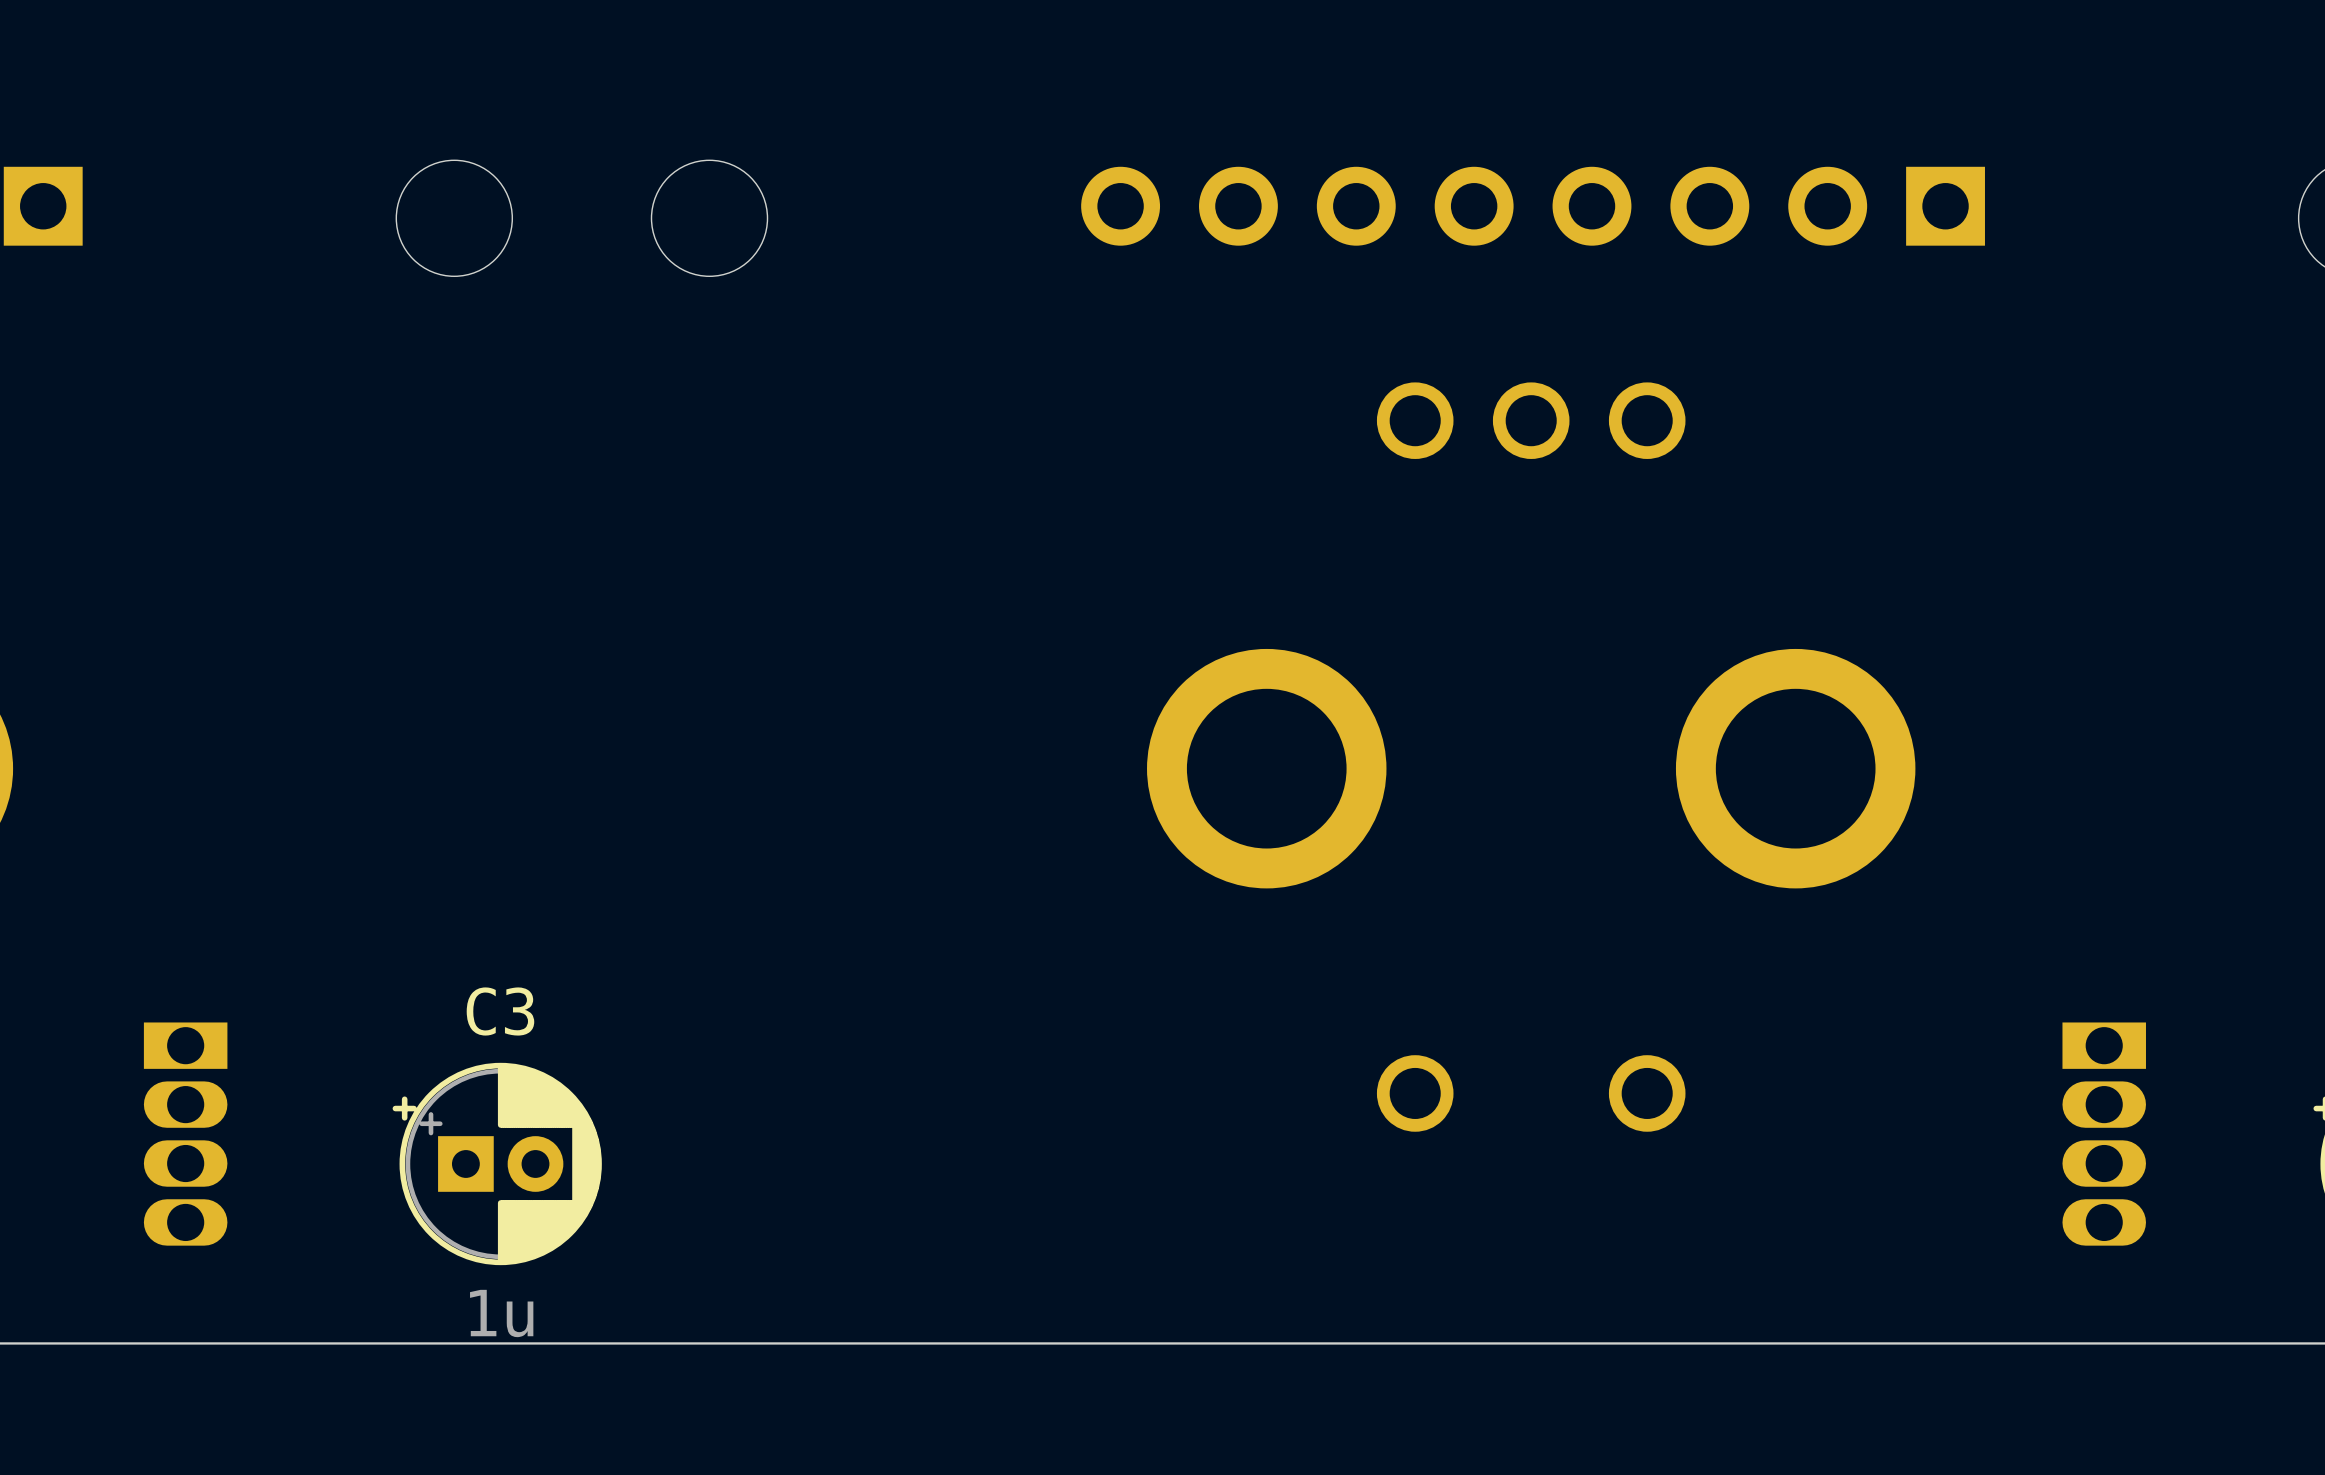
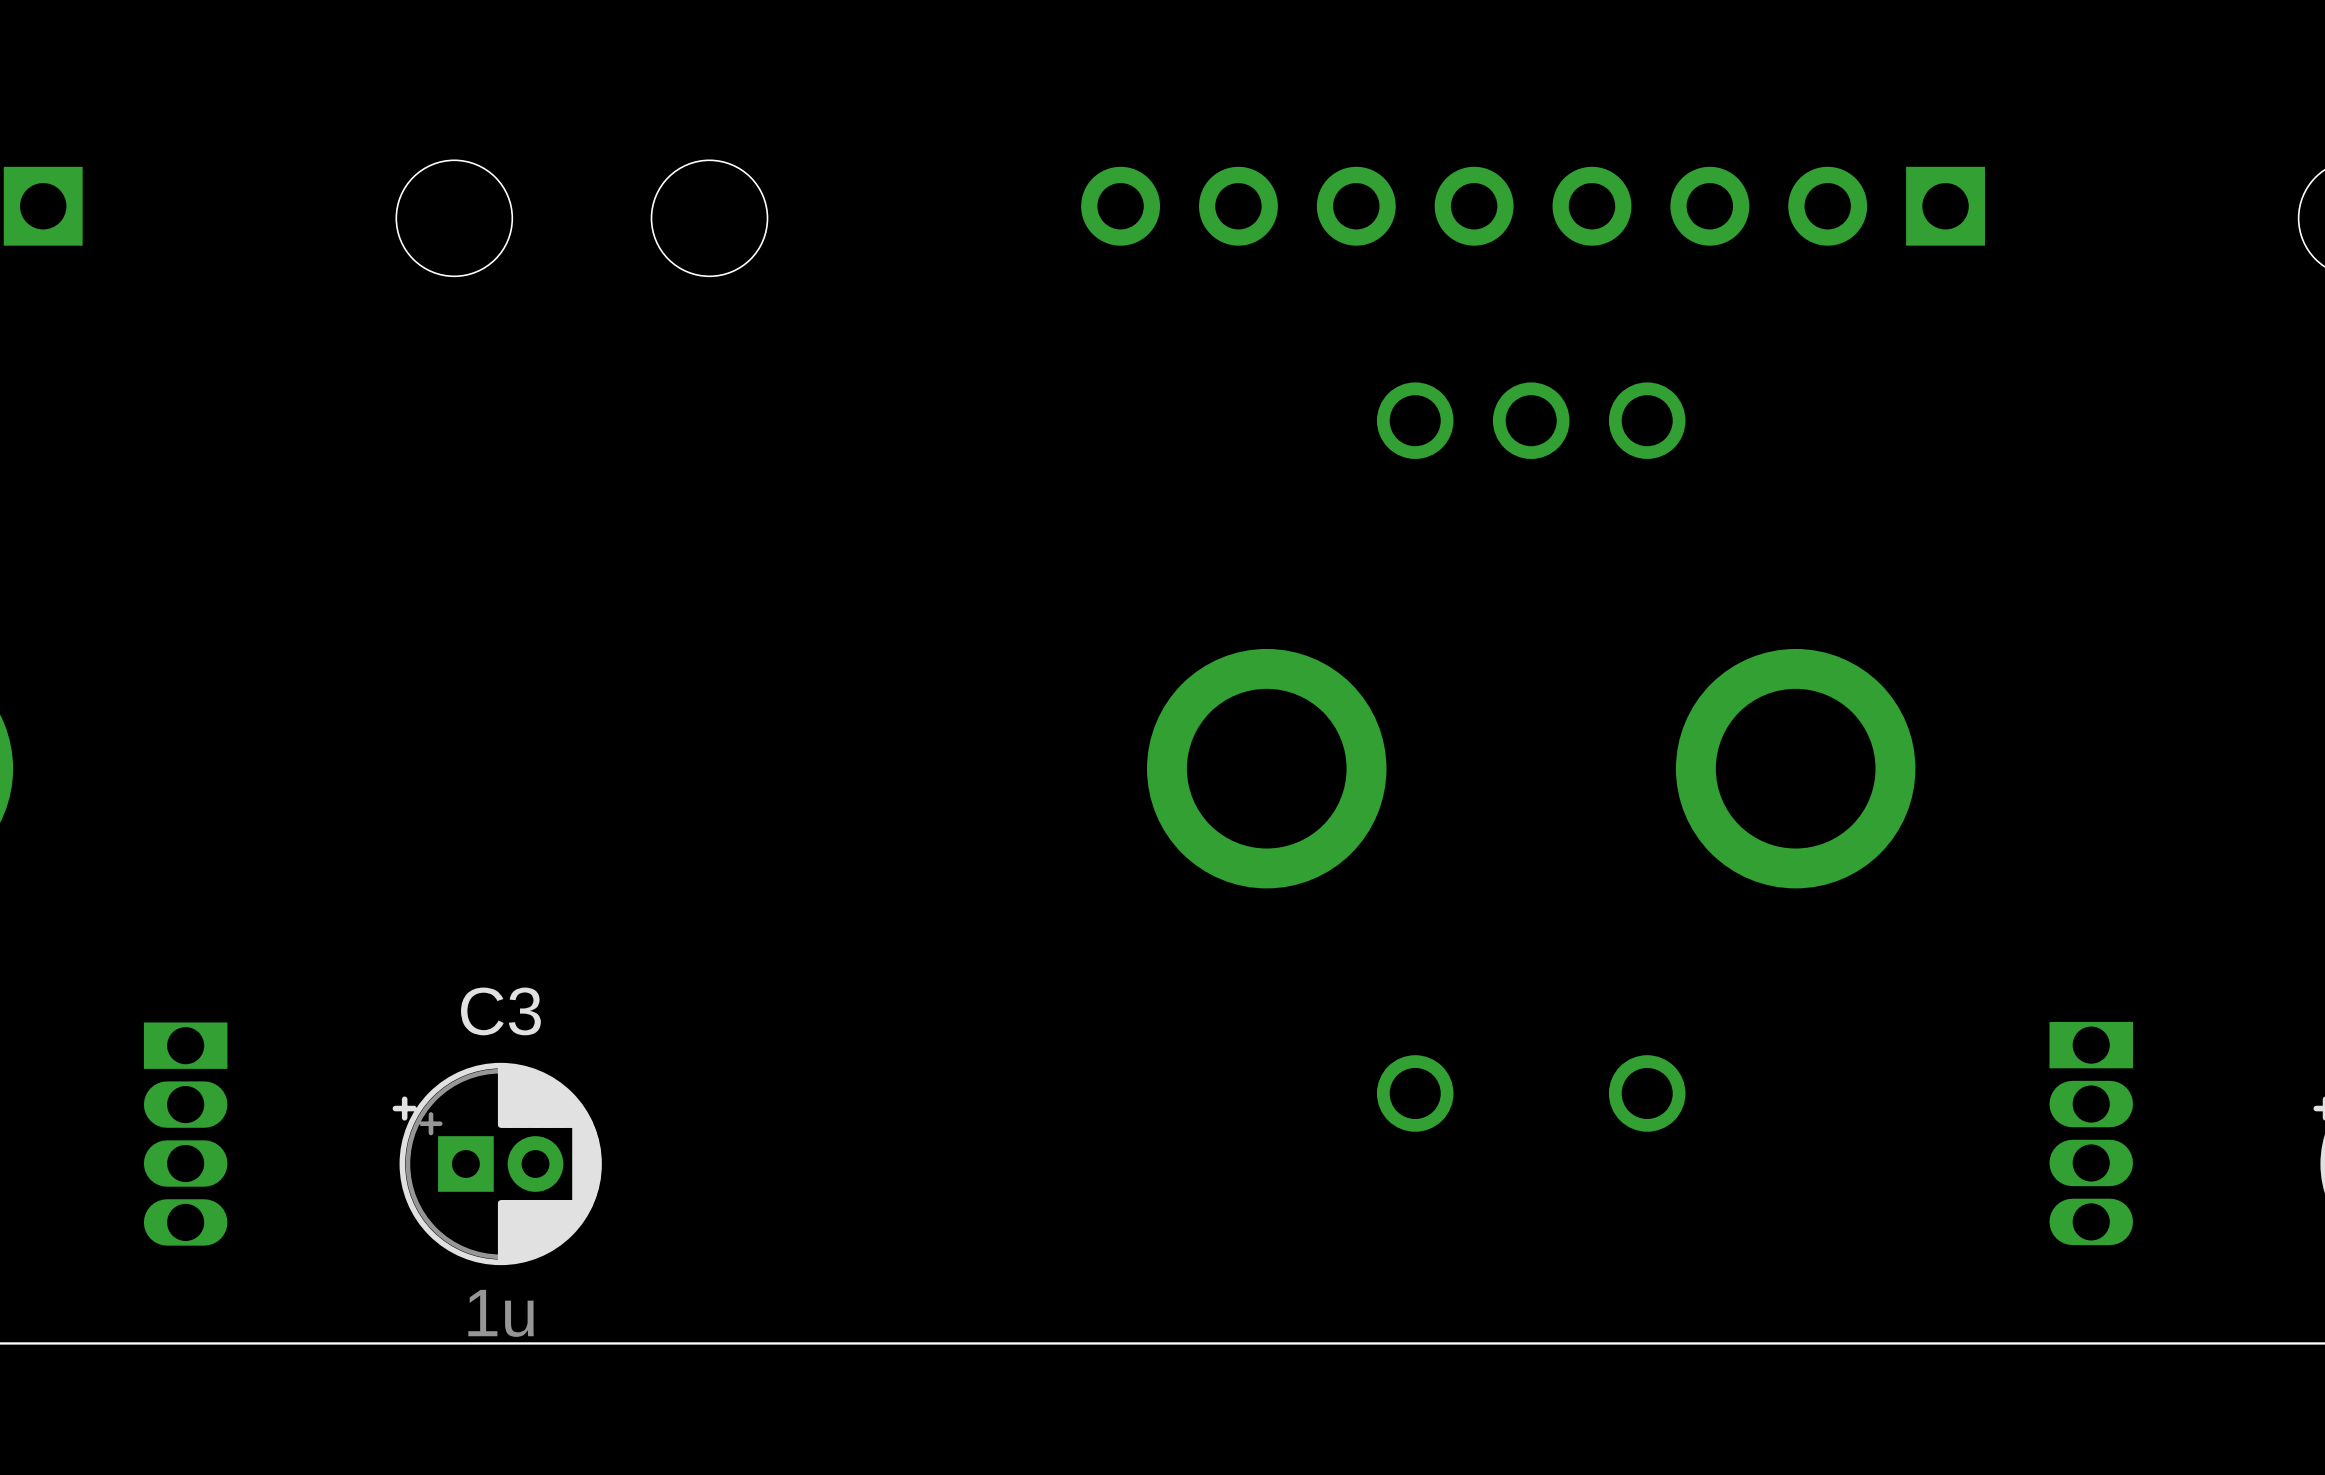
part position: (2104, 1134) -> (2091, 1133)

